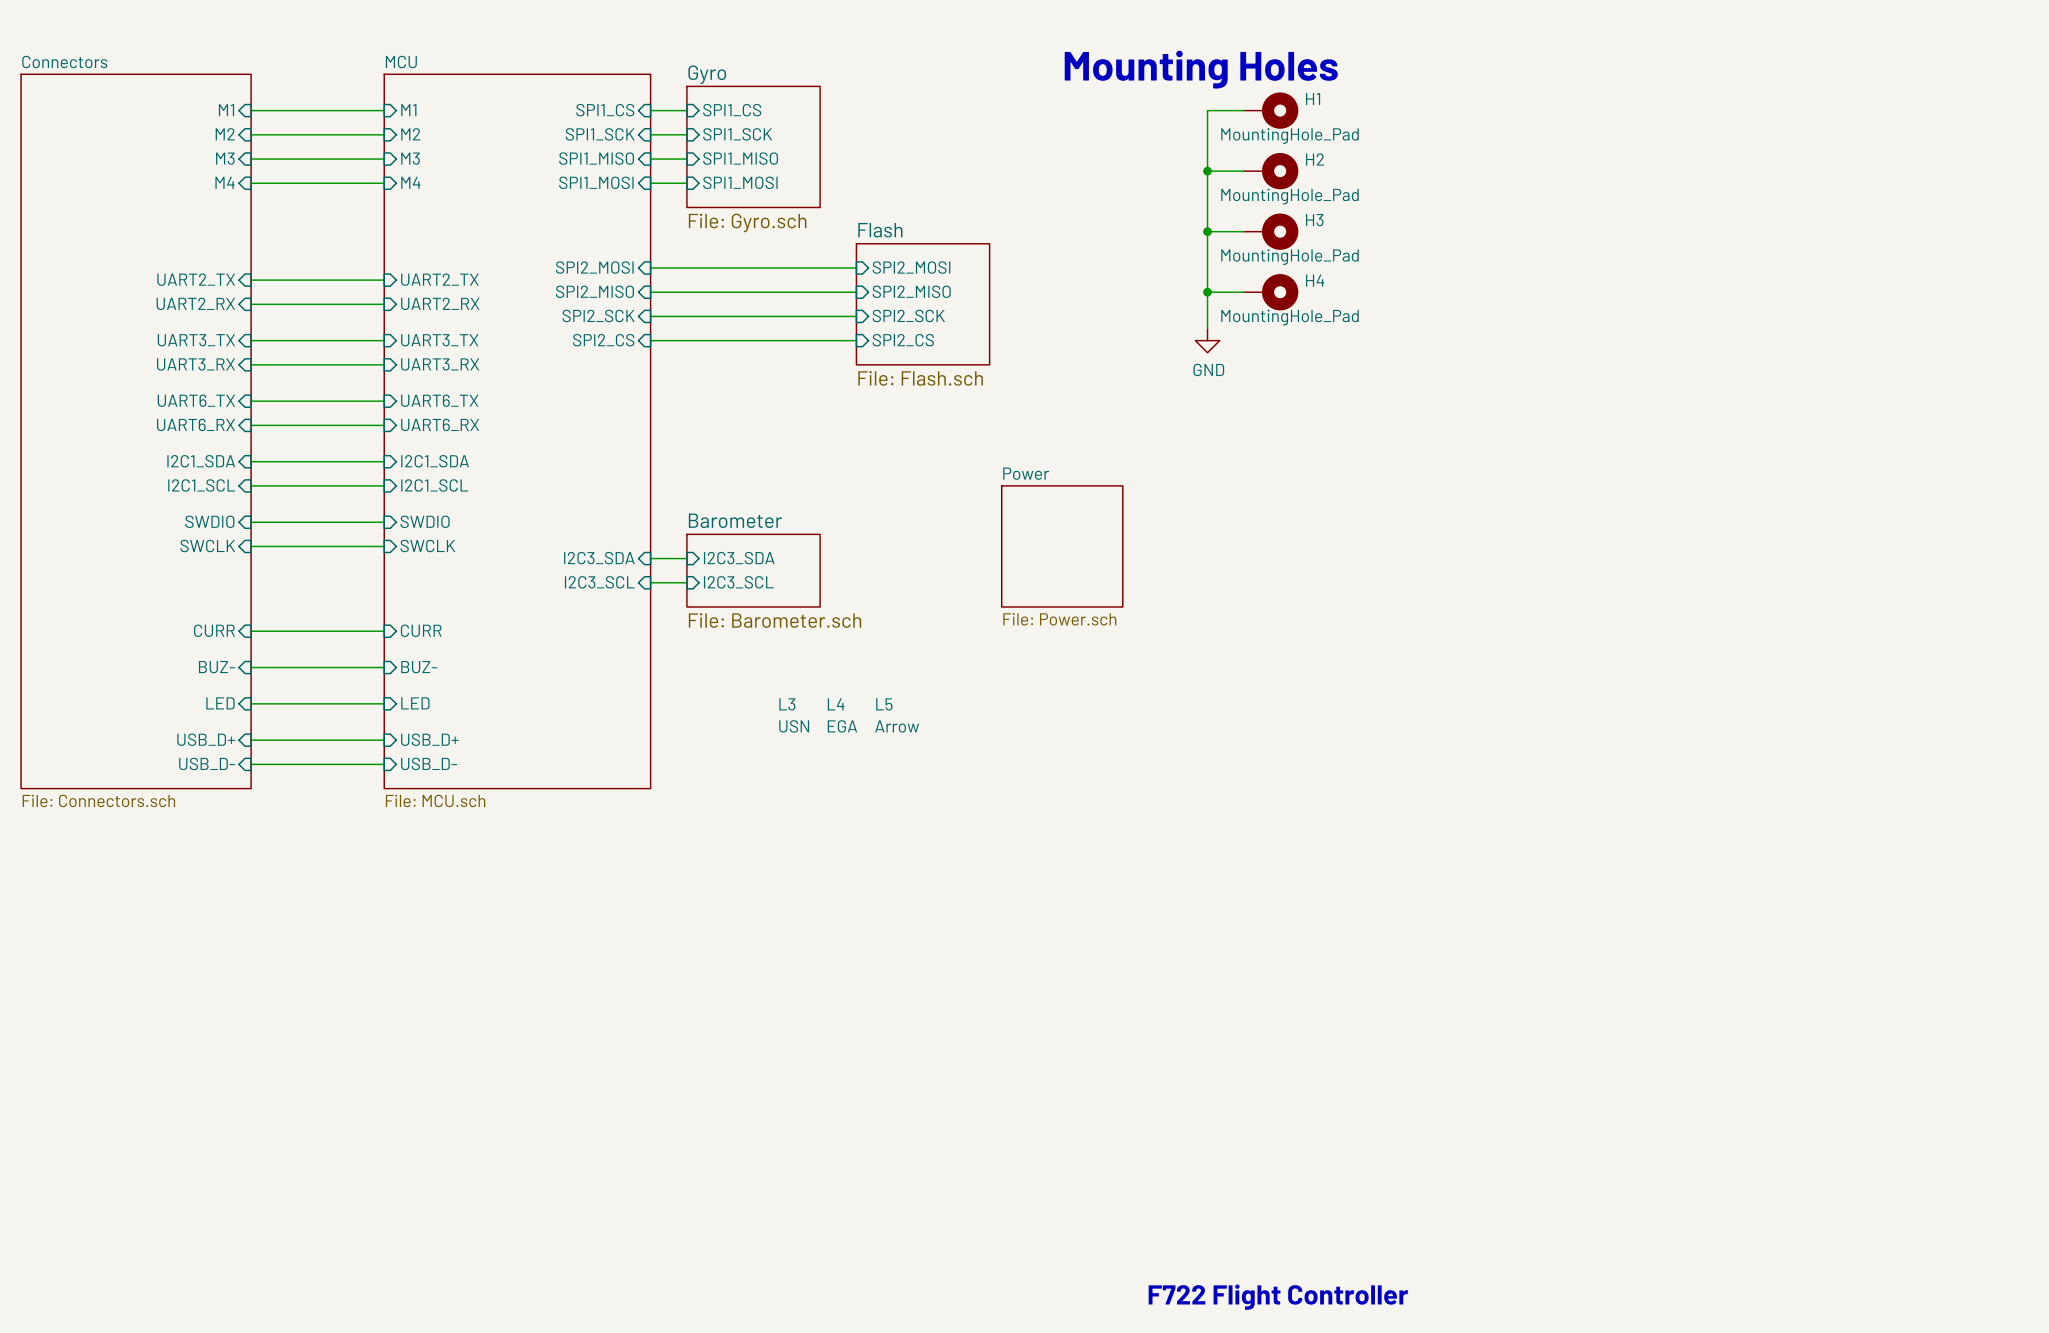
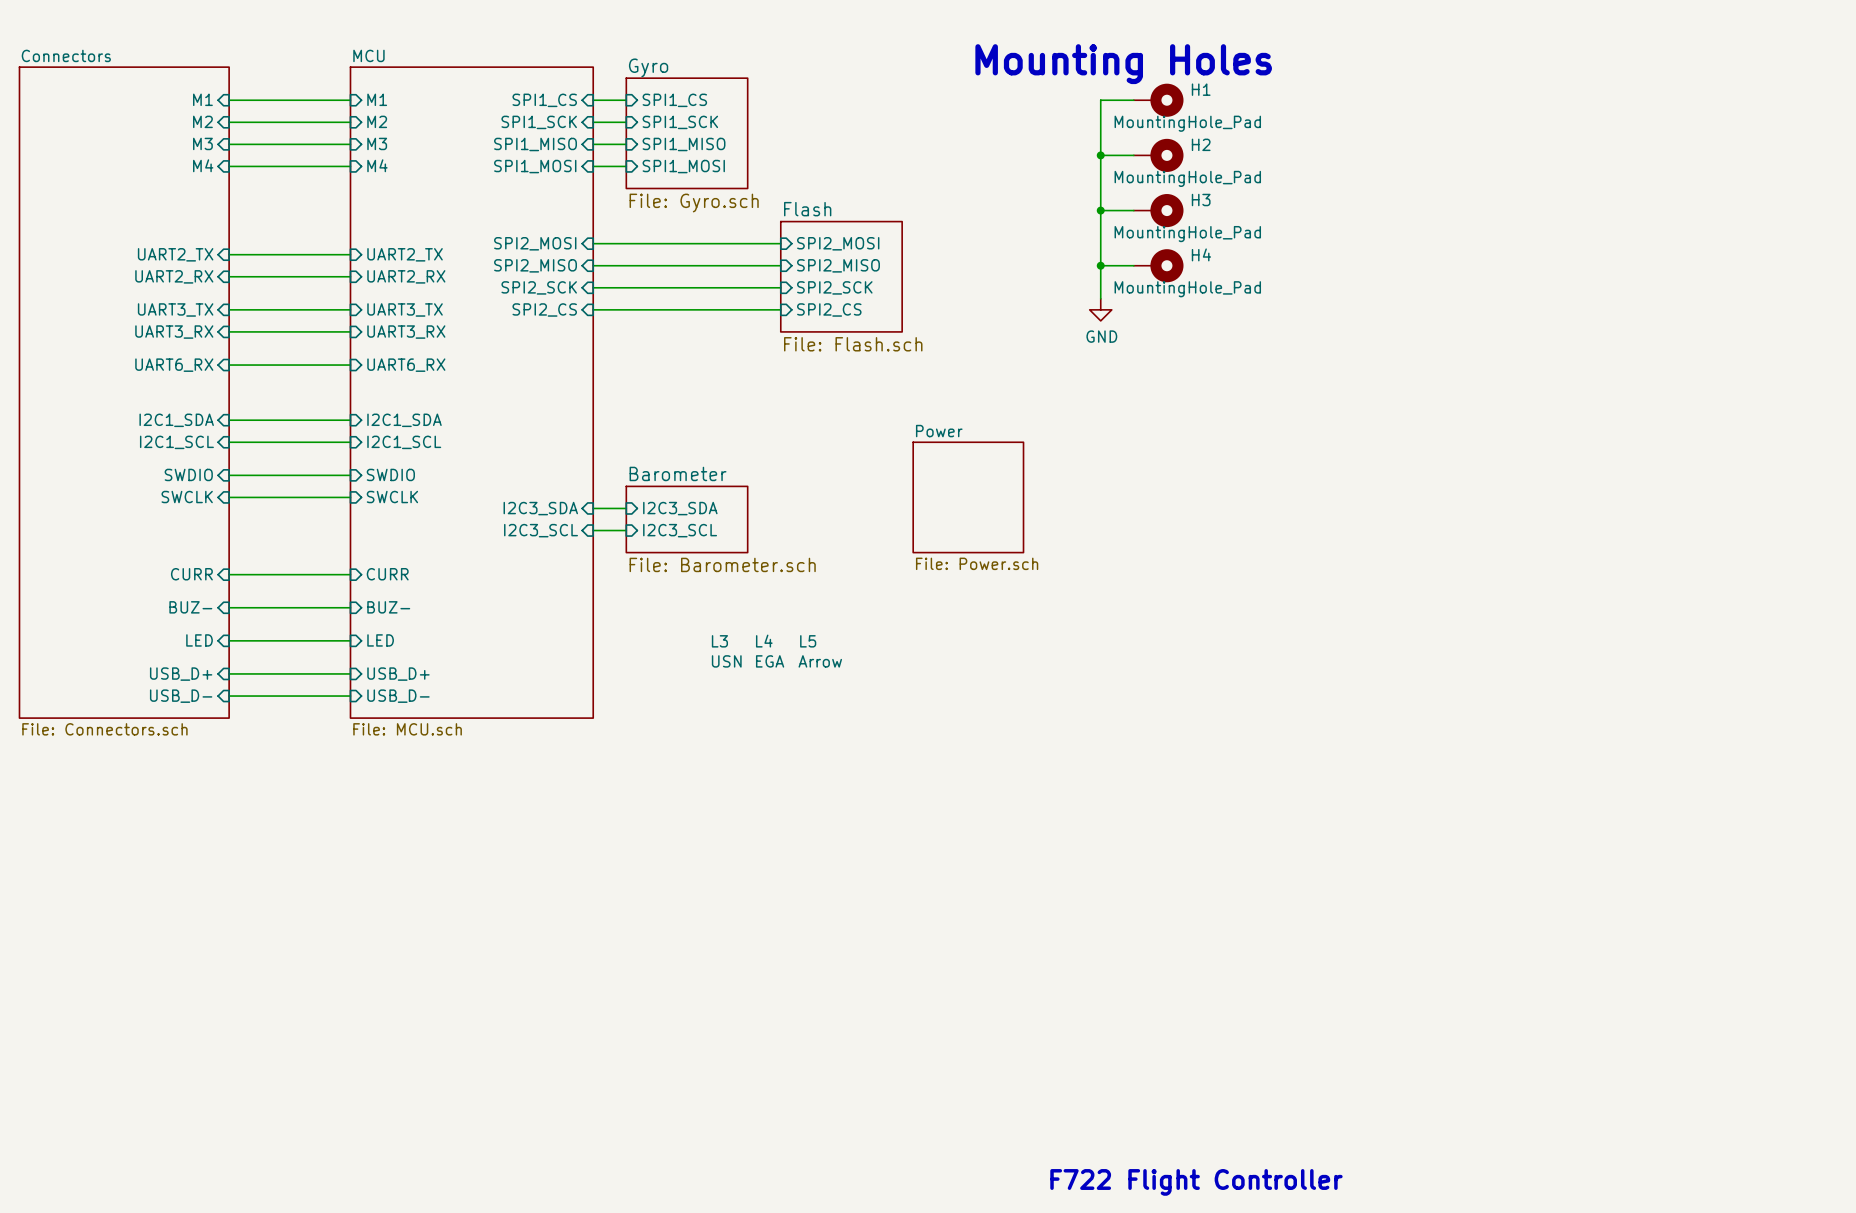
sheet pin: UART6_TX (196, 400) -> UART6_RX (174, 365)
sheet pin: UART6_TX (439, 400) -> UART6_RX (406, 365)
sheet pin: UART6_RX (196, 424) -> none
sheet pin: UART6_RX (440, 424) -> none
wire: (251, 425) (384, 425) -> none

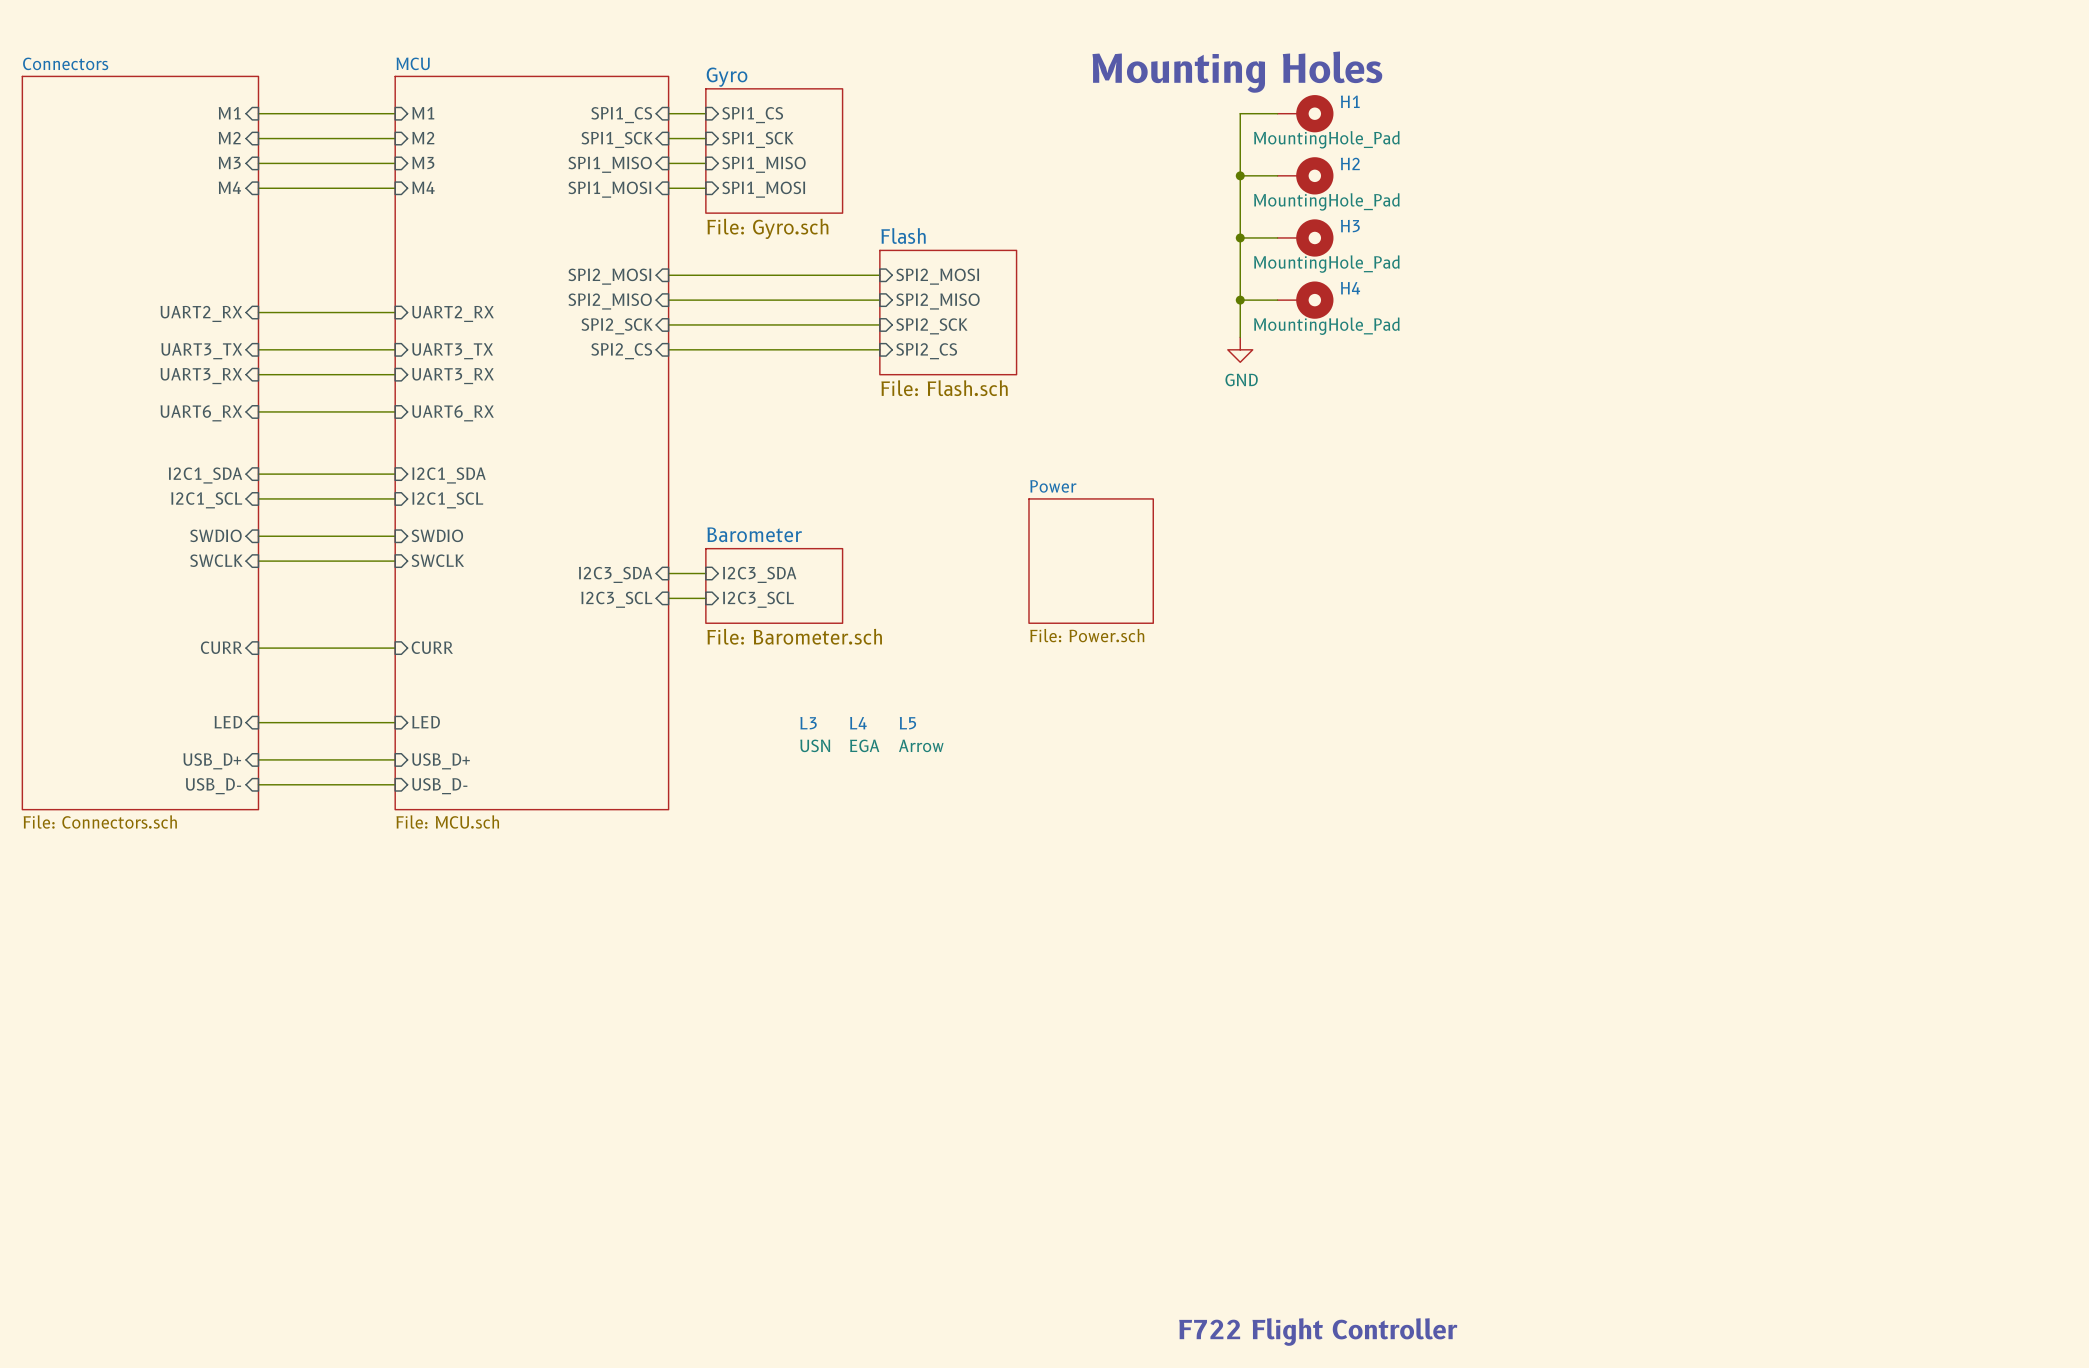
sheet pin: UART2_TX (175, 254) -> none
wire: (229, 254) (350, 254) -> none
sheet pin: UART2_TX (405, 254) -> none
sheet pin: BUZ- (190, 607) -> none
wire: (229, 607) (350, 607) -> none
sheet pin: BUZ- (388, 607) -> none

